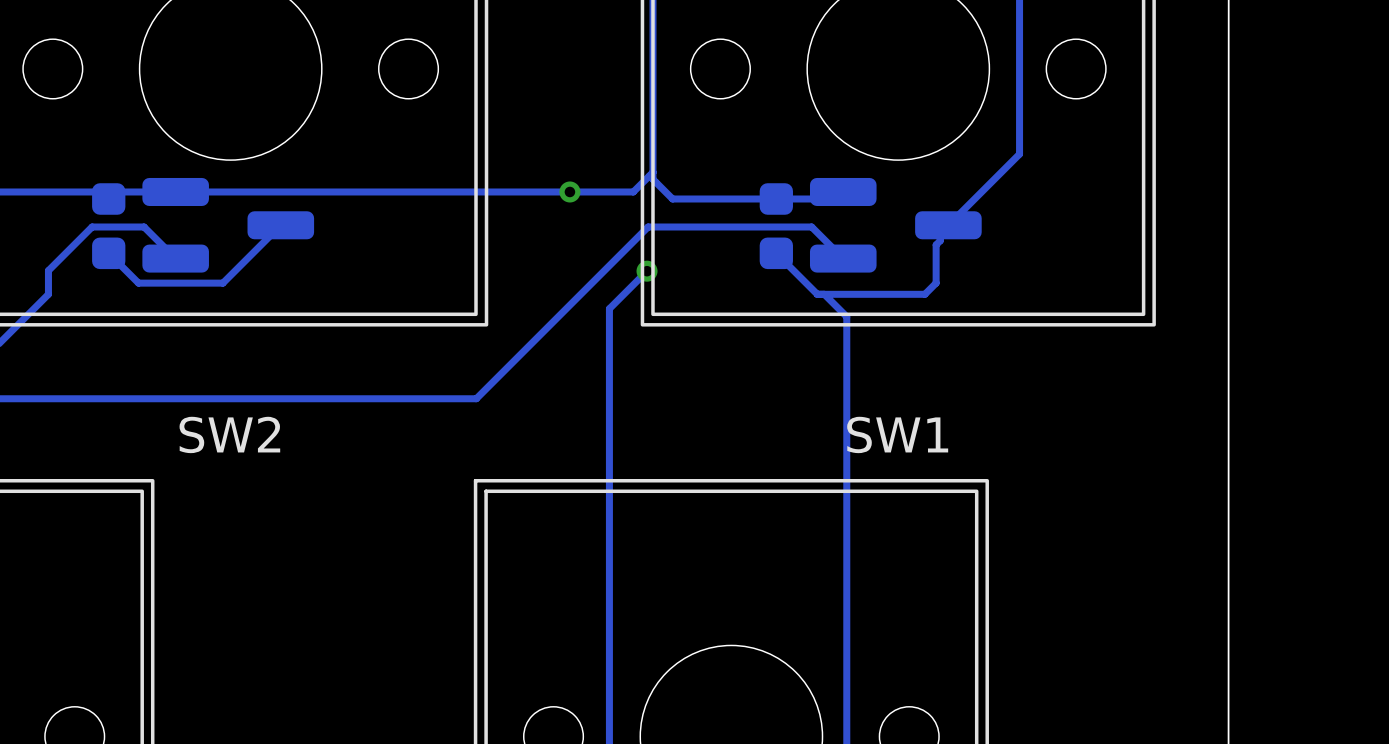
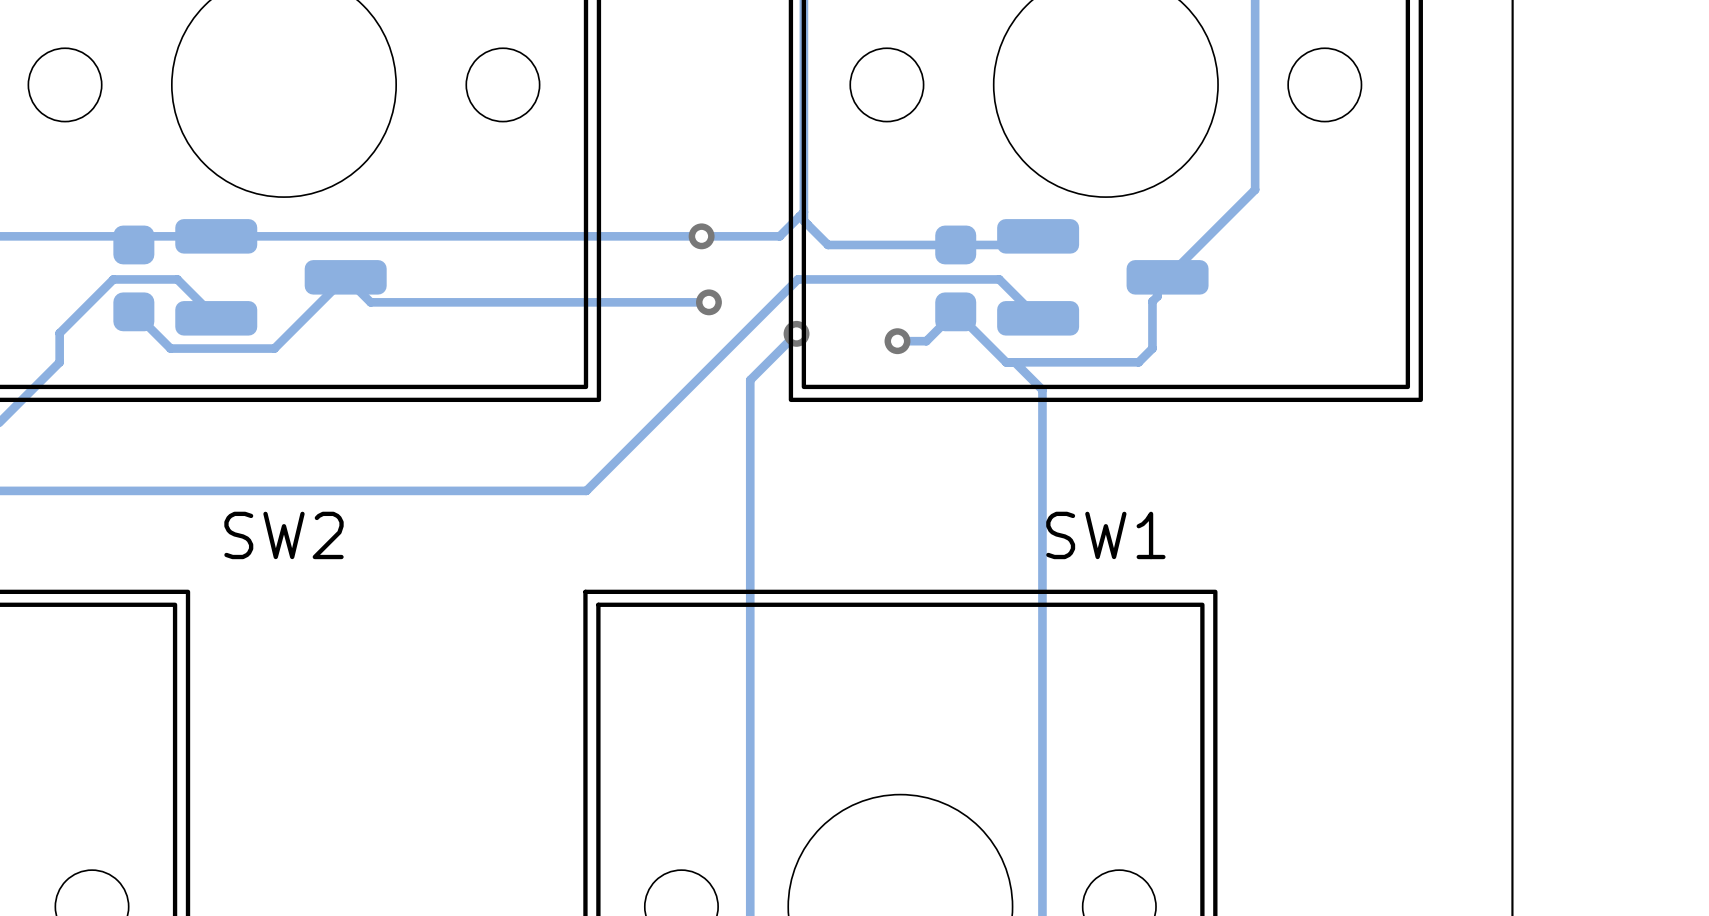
track: none -> (345, 277) (370, 302) (708, 302)
via: none -> (708, 302)
track: none -> (955, 311) (926, 341) (897, 341)
via: none -> (897, 341)

